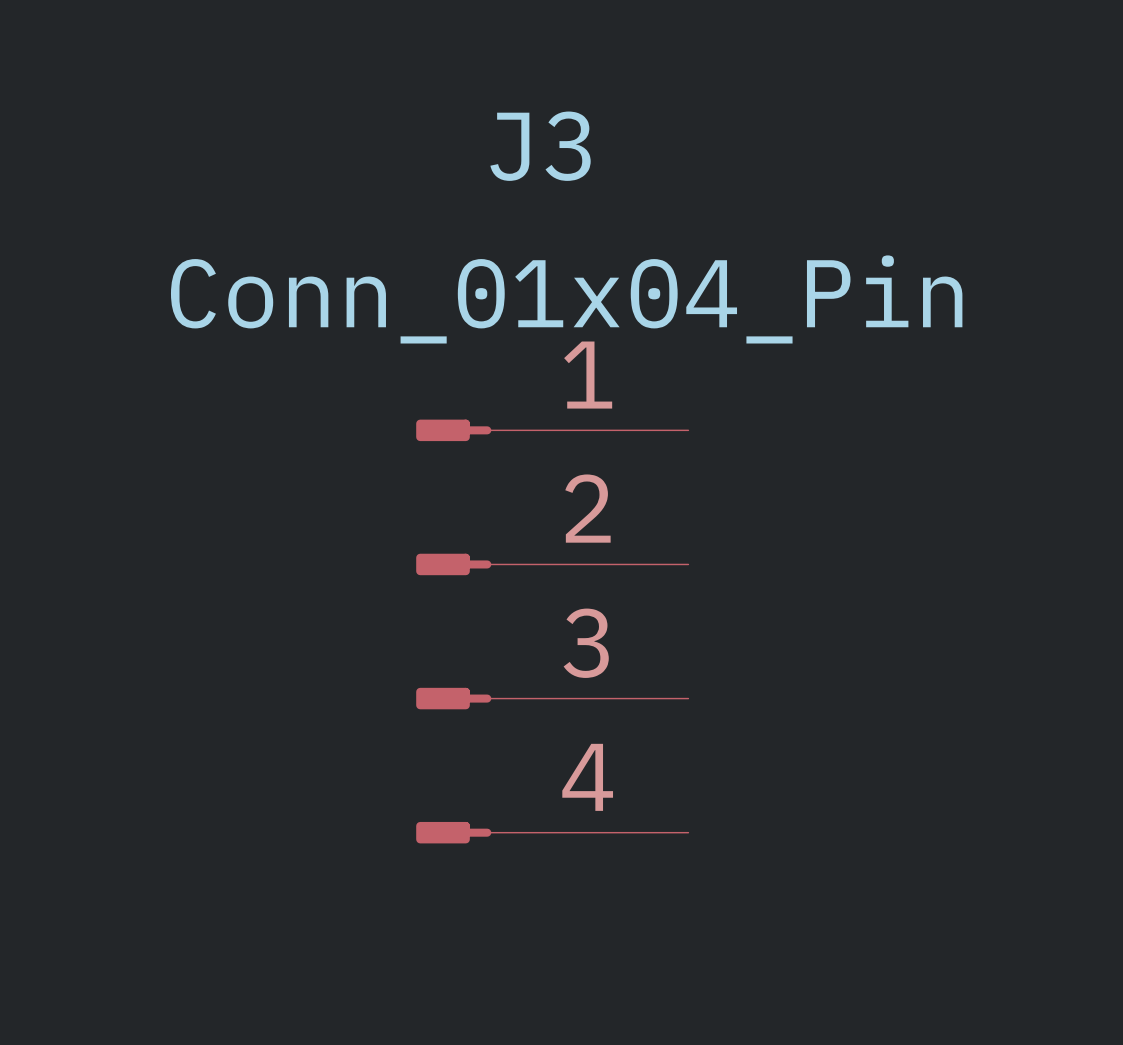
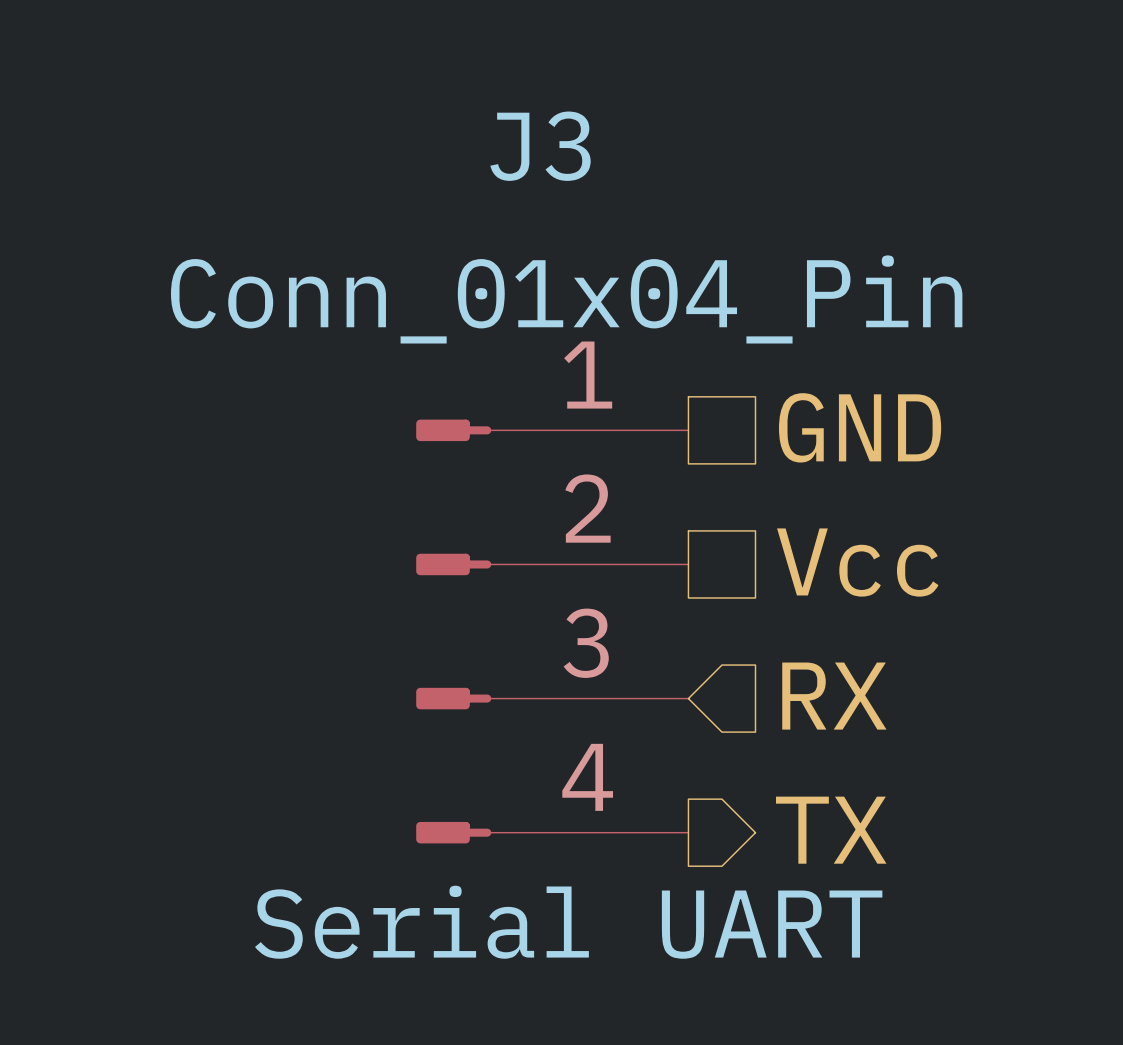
hierarchical label: none -> GND (860, 427)
hierarchical label: none -> Vcc (857, 562)
hierarchical label: none -> RX (834, 696)
hierarchical label: none -> TX (831, 830)
J3 text: none -> Serial UART (568, 922)

